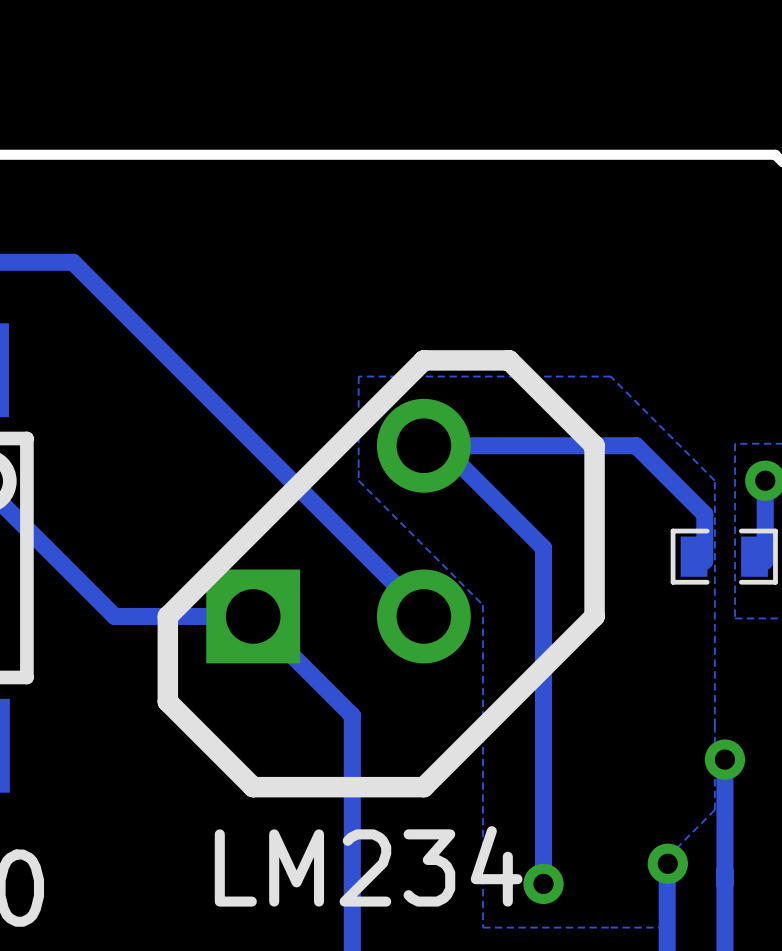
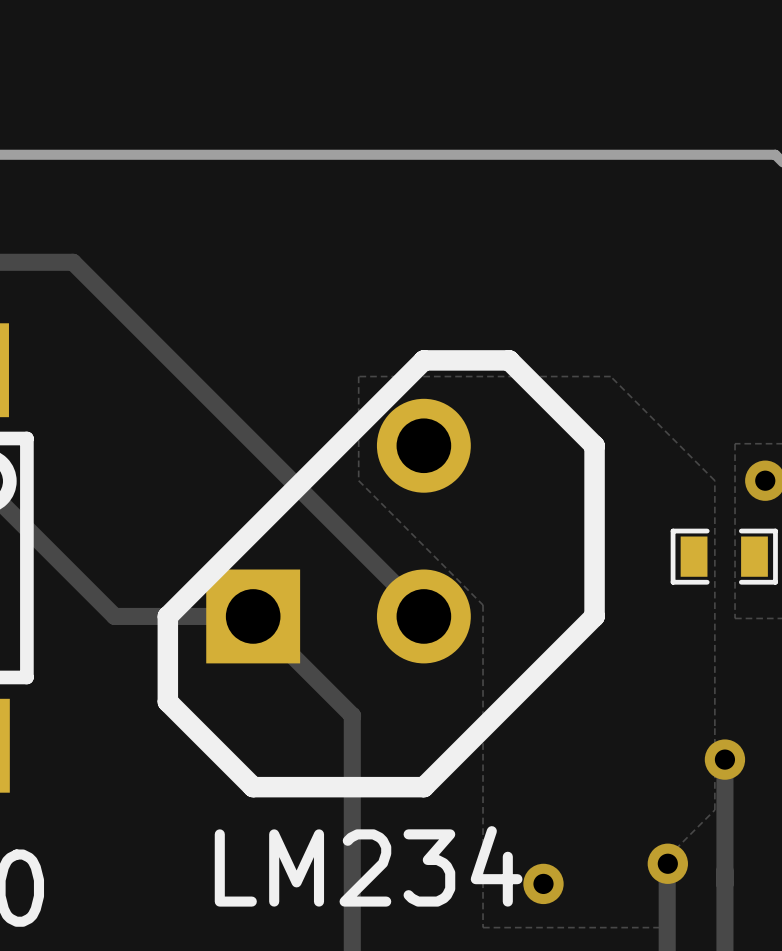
track: (765, 480) (765, 561) -> none
track: (704, 561) (704, 514) (636, 445) (441, 445) (543, 547) (543, 883) -> none

